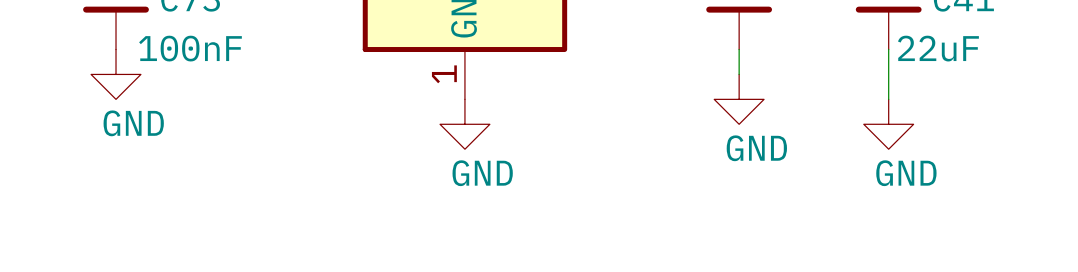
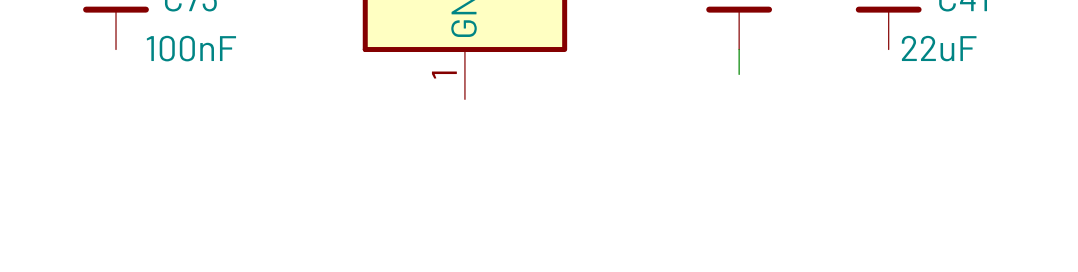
wire: (888, 49) (888, 99) -> none
power symbol: GND (116, 74) -> none
power symbol: GND (739, 99) -> none
power symbol: GND (464, 124) -> none
power symbol: GND (888, 124) -> none

